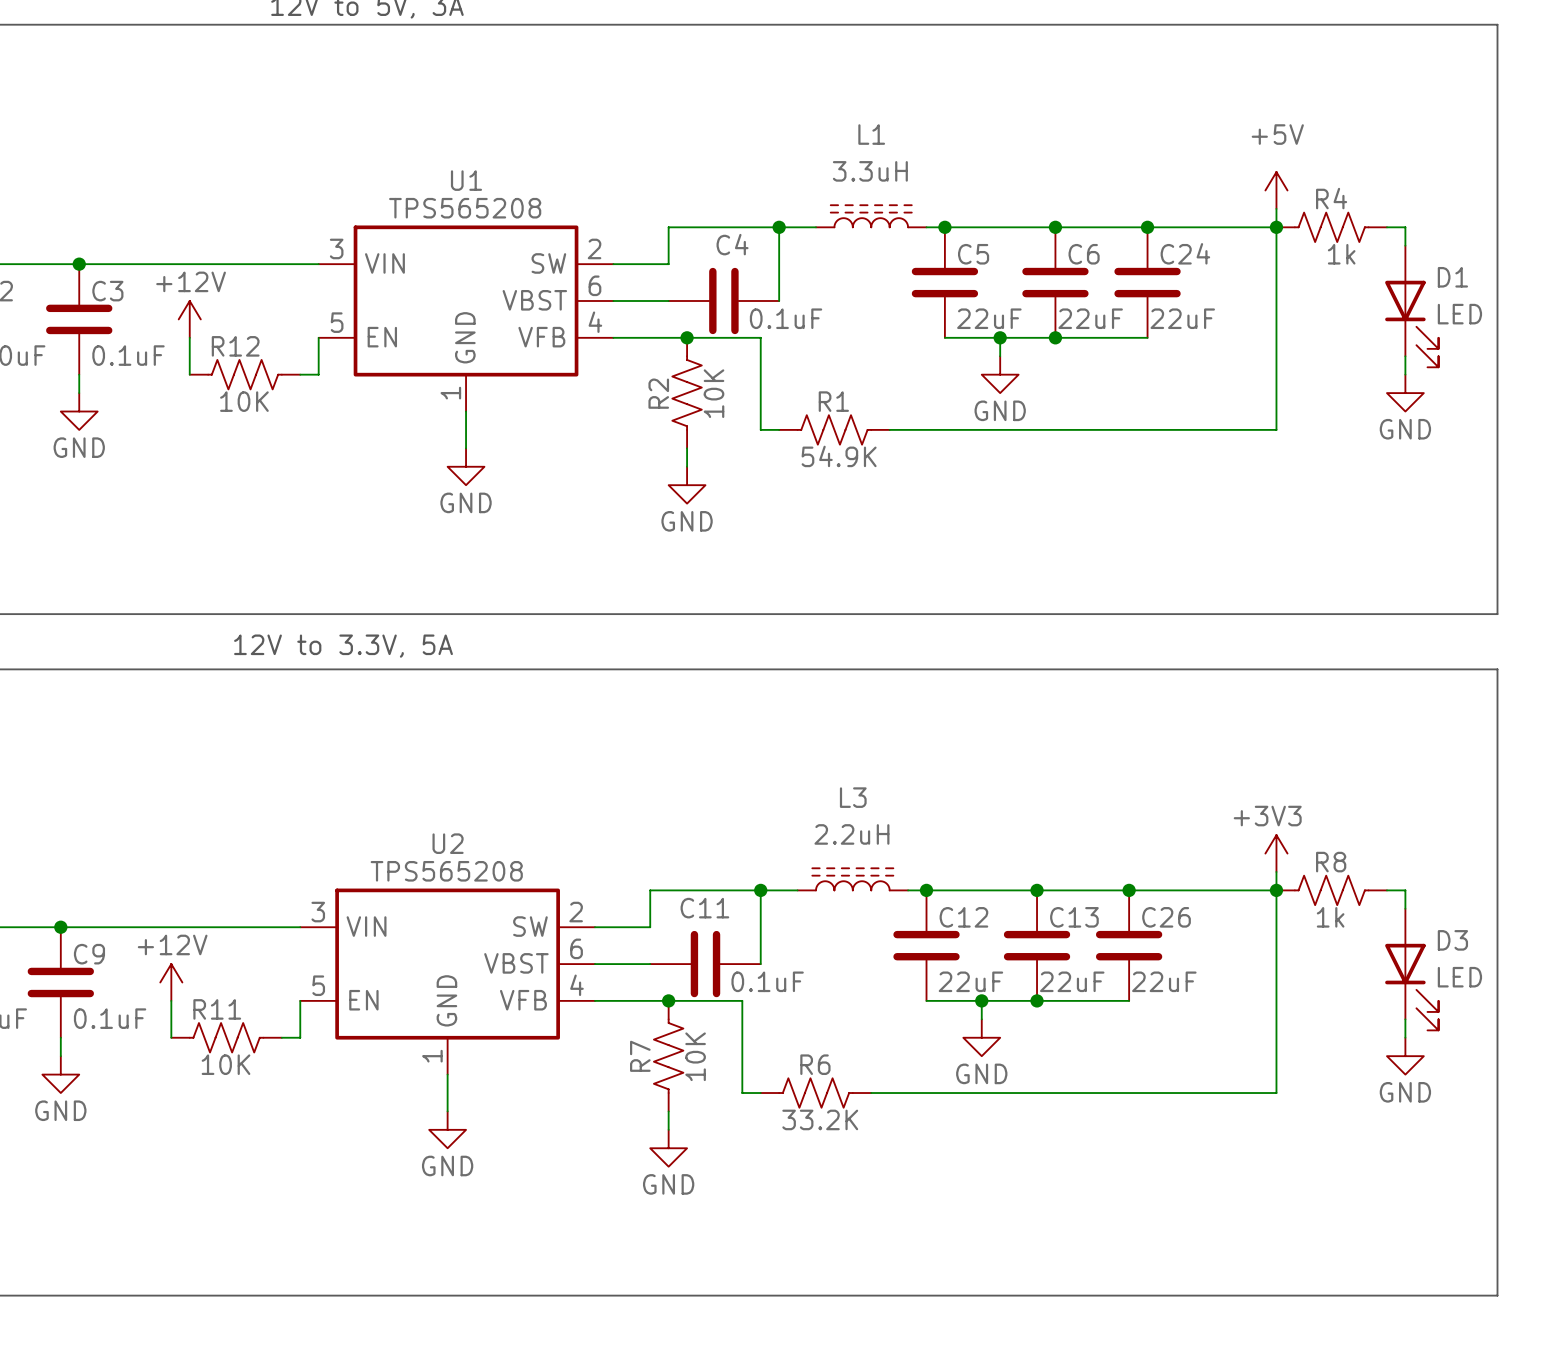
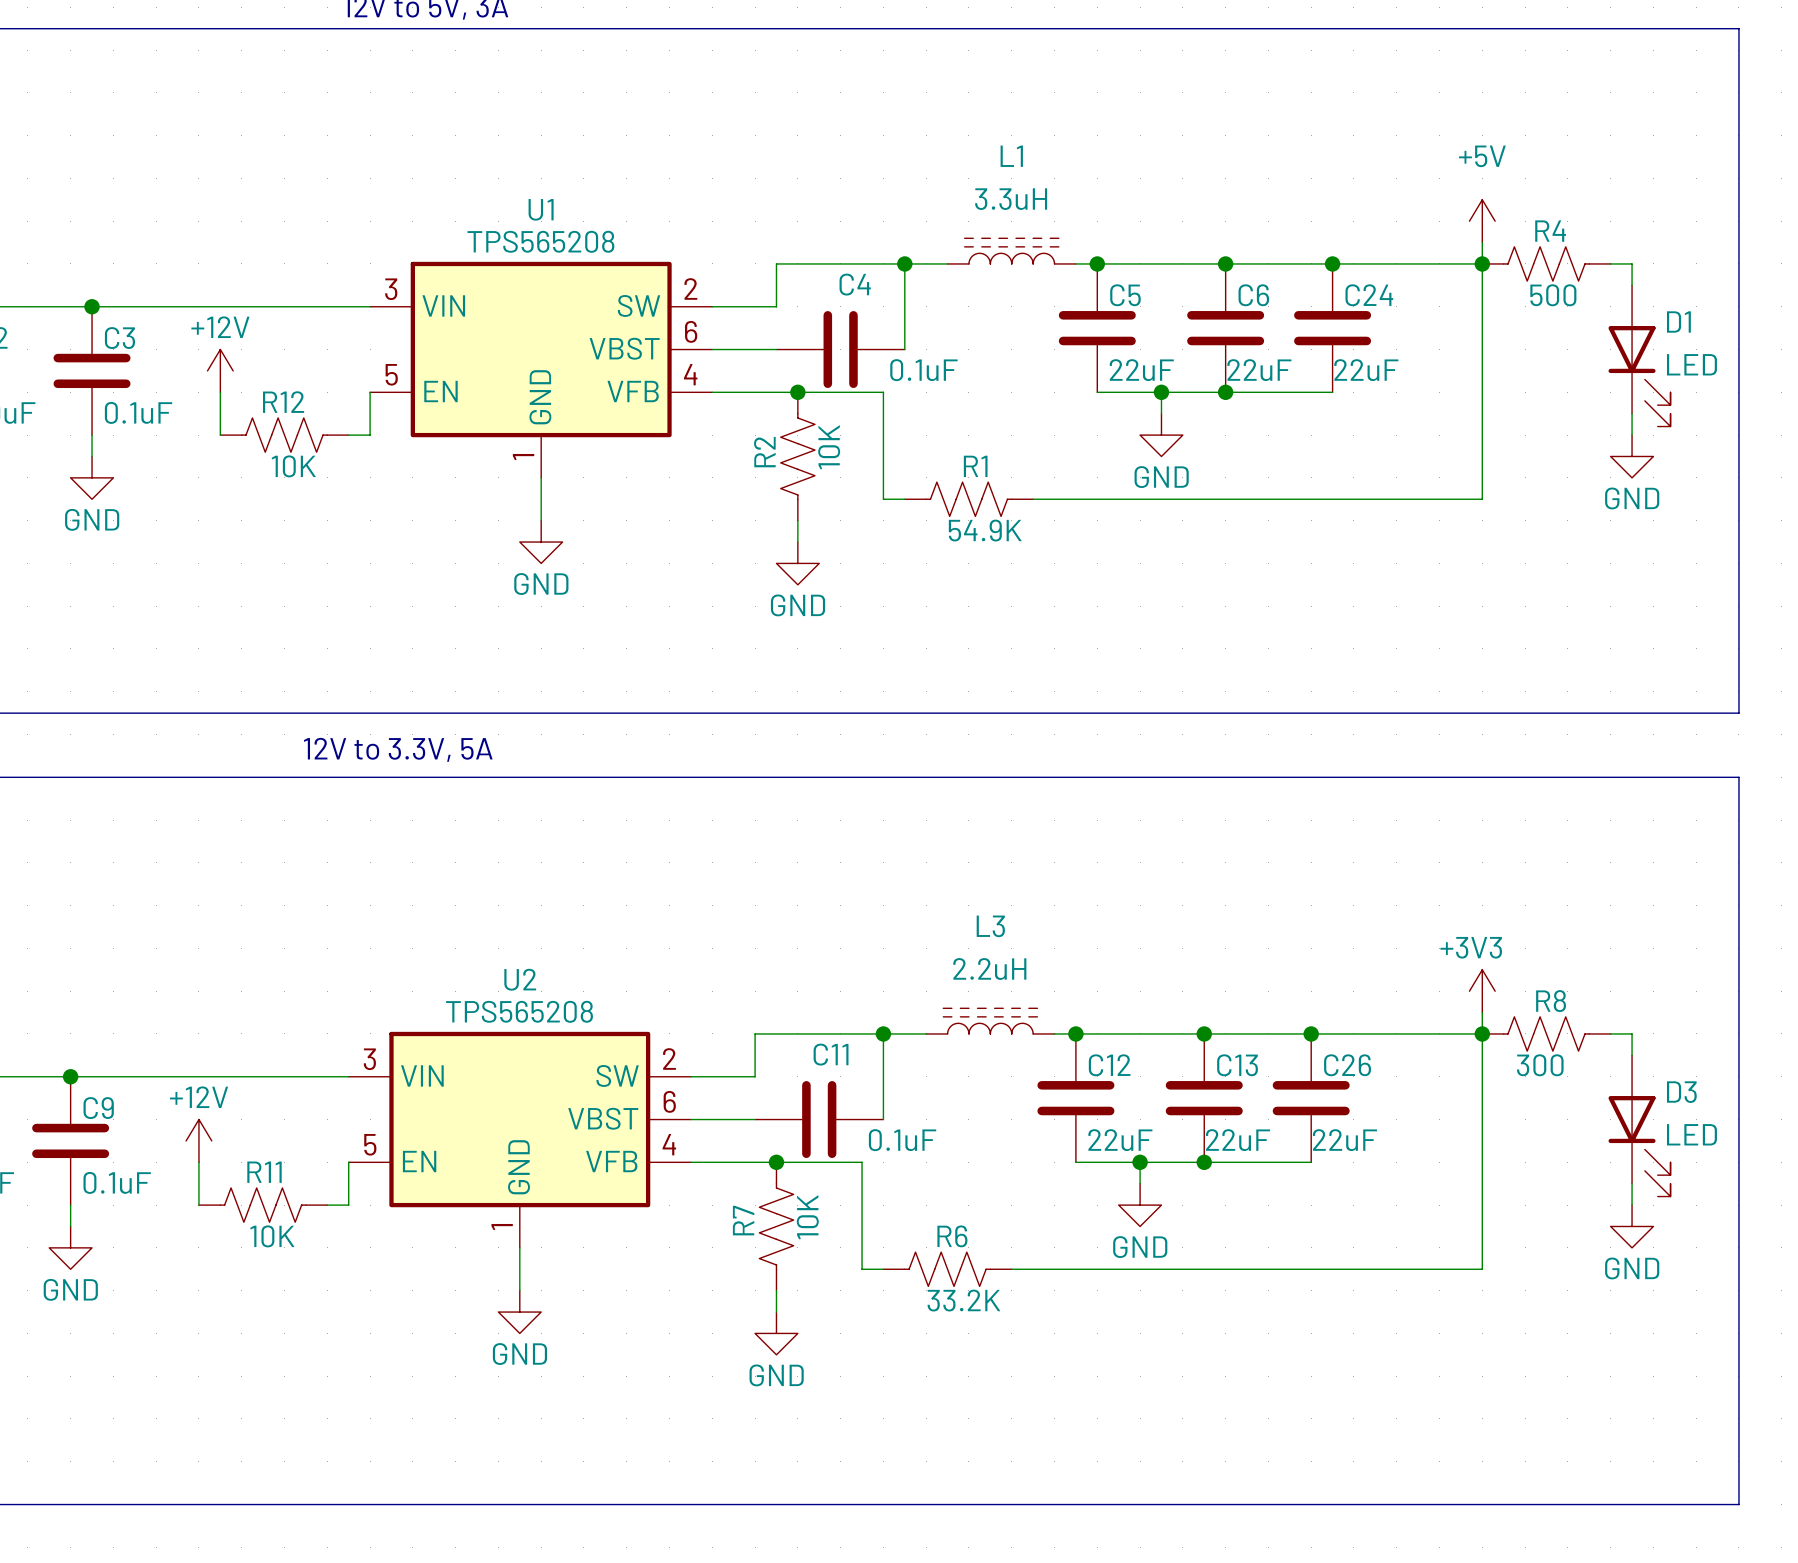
R4 value: 1k (1341, 254) -> 500 (1553, 295)
R8 value: 1k (1330, 917) -> 300 (1540, 1065)

